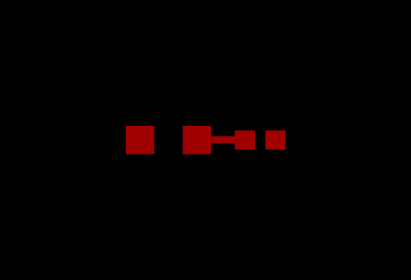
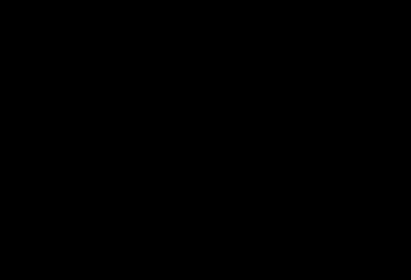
top track: (241, 139) (197, 139) -> none
part: (168, 140) -> none
part: (260, 140) -> none

